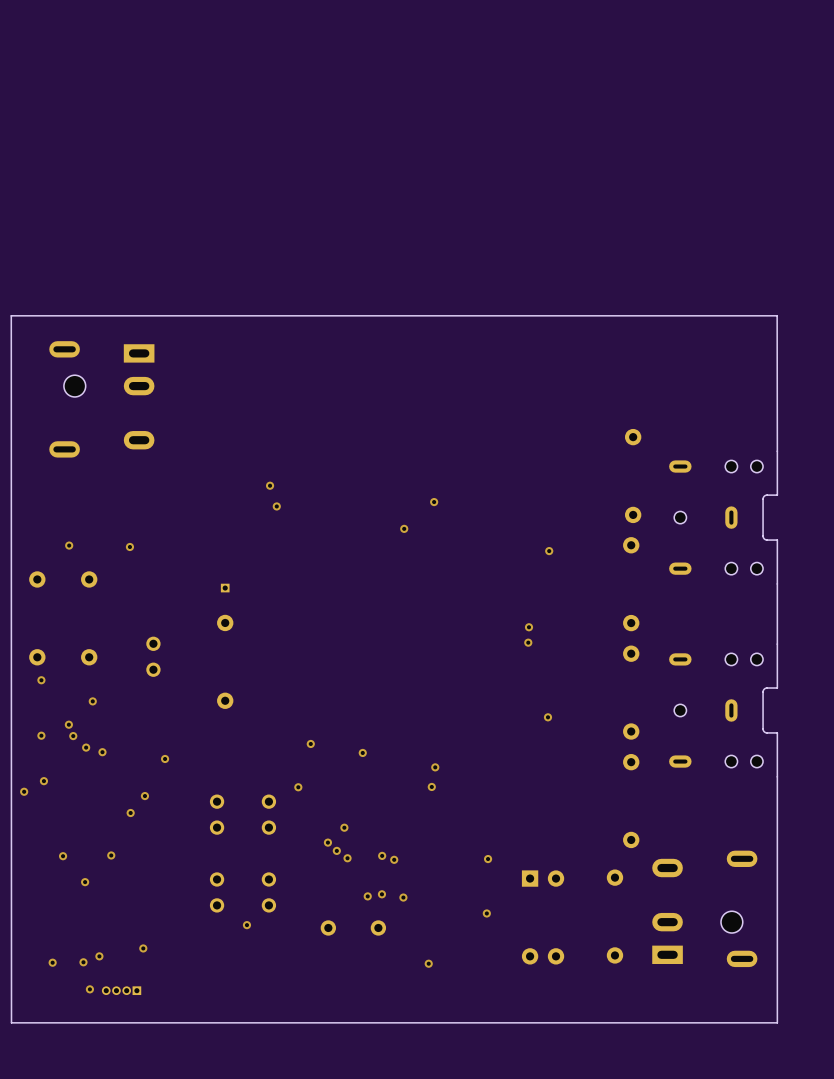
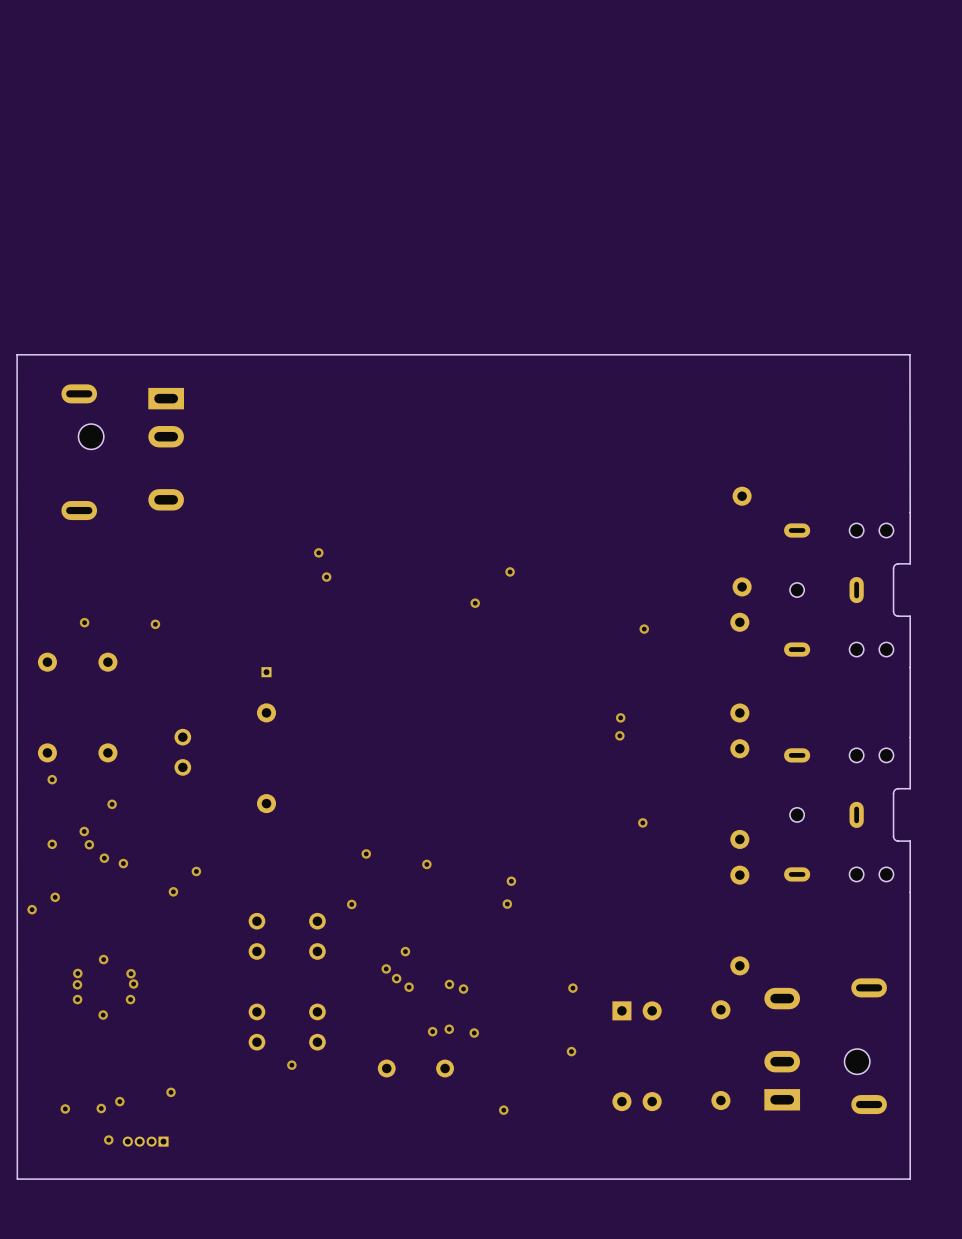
via: none -> (173, 891)
via: (144, 796) -> none
via: (130, 813) -> none
via: none -> (103, 959)
via: none -> (77, 973)
via: none -> (131, 973)
via: none -> (77, 999)
via: none -> (130, 999)

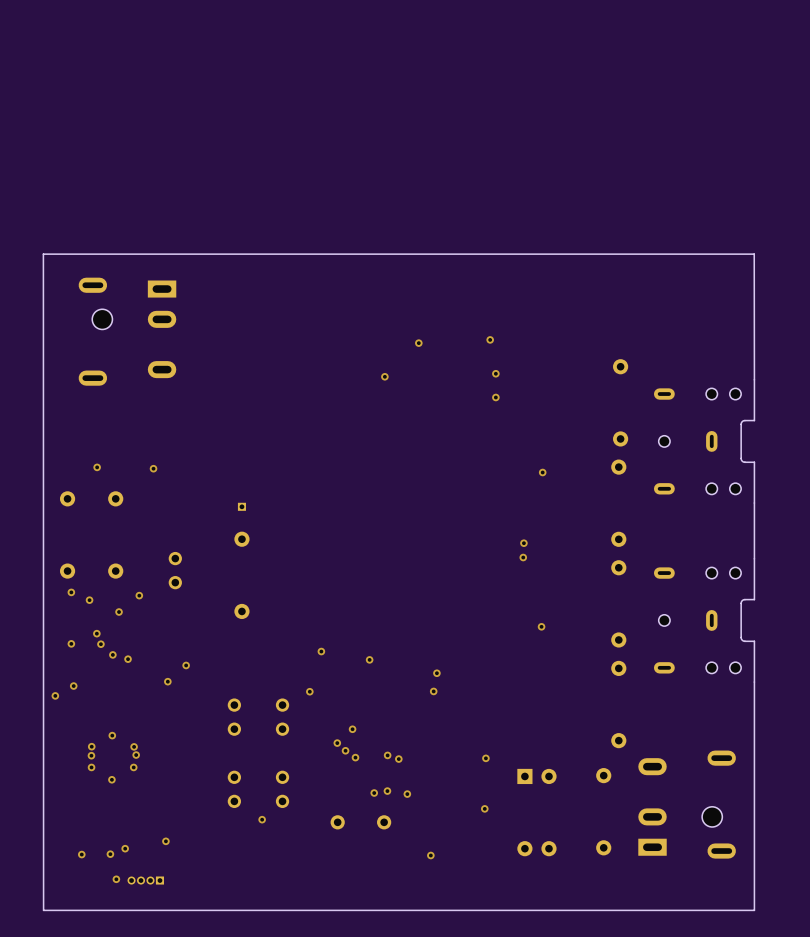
via: none -> (490, 339)
via: none -> (418, 343)
via: none -> (495, 373)
via: none -> (384, 376)
via: none -> (495, 397)
via: (318, 552) -> none
via: (510, 571) -> none
via: (326, 577) -> none
via: (475, 603) -> none
via: none -> (139, 595)
via: none -> (89, 600)

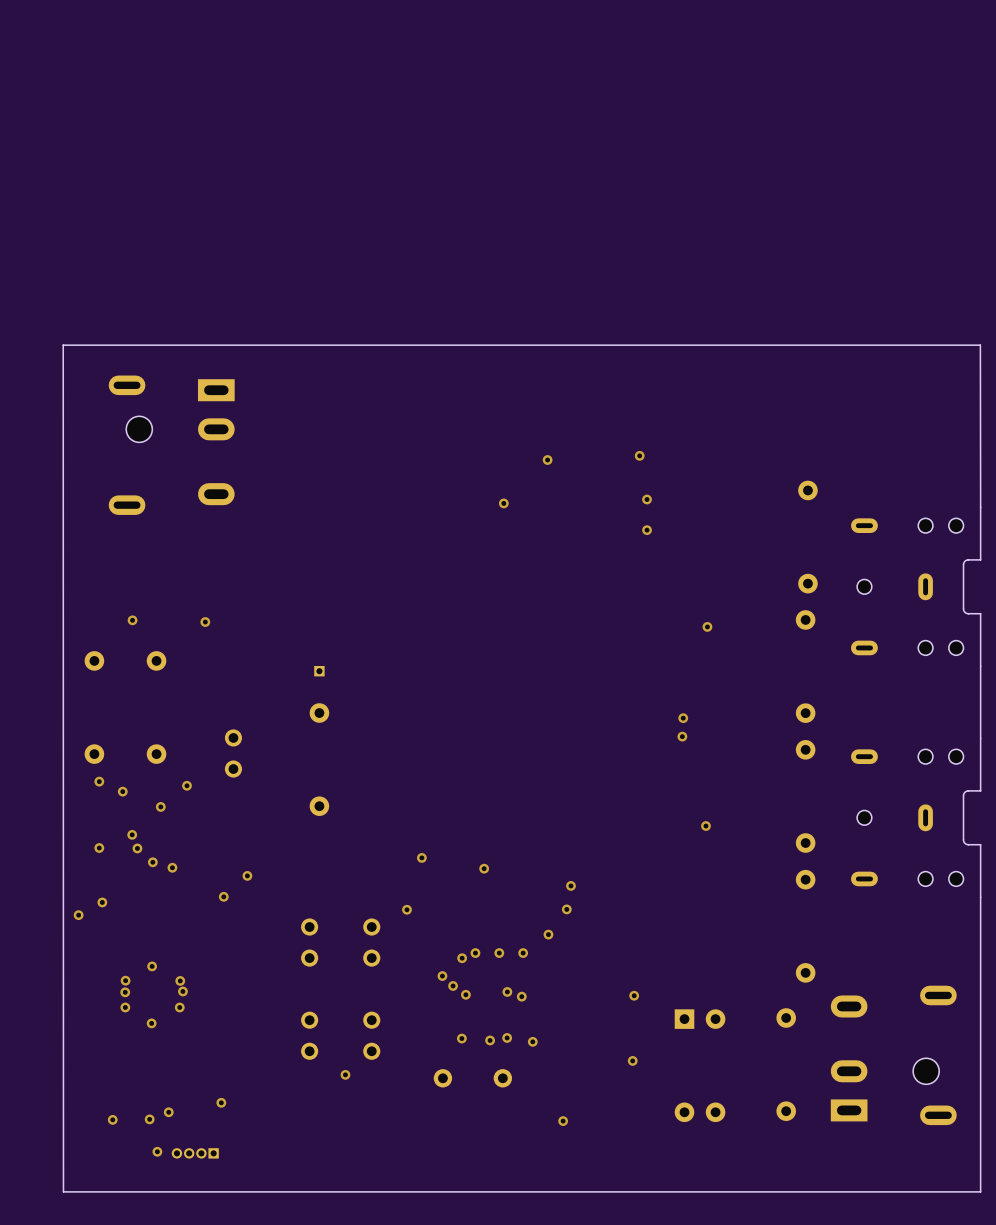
via: none -> (548, 934)
via: none -> (475, 953)
via: none -> (499, 953)
via: none -> (523, 953)
via: none -> (461, 1038)

